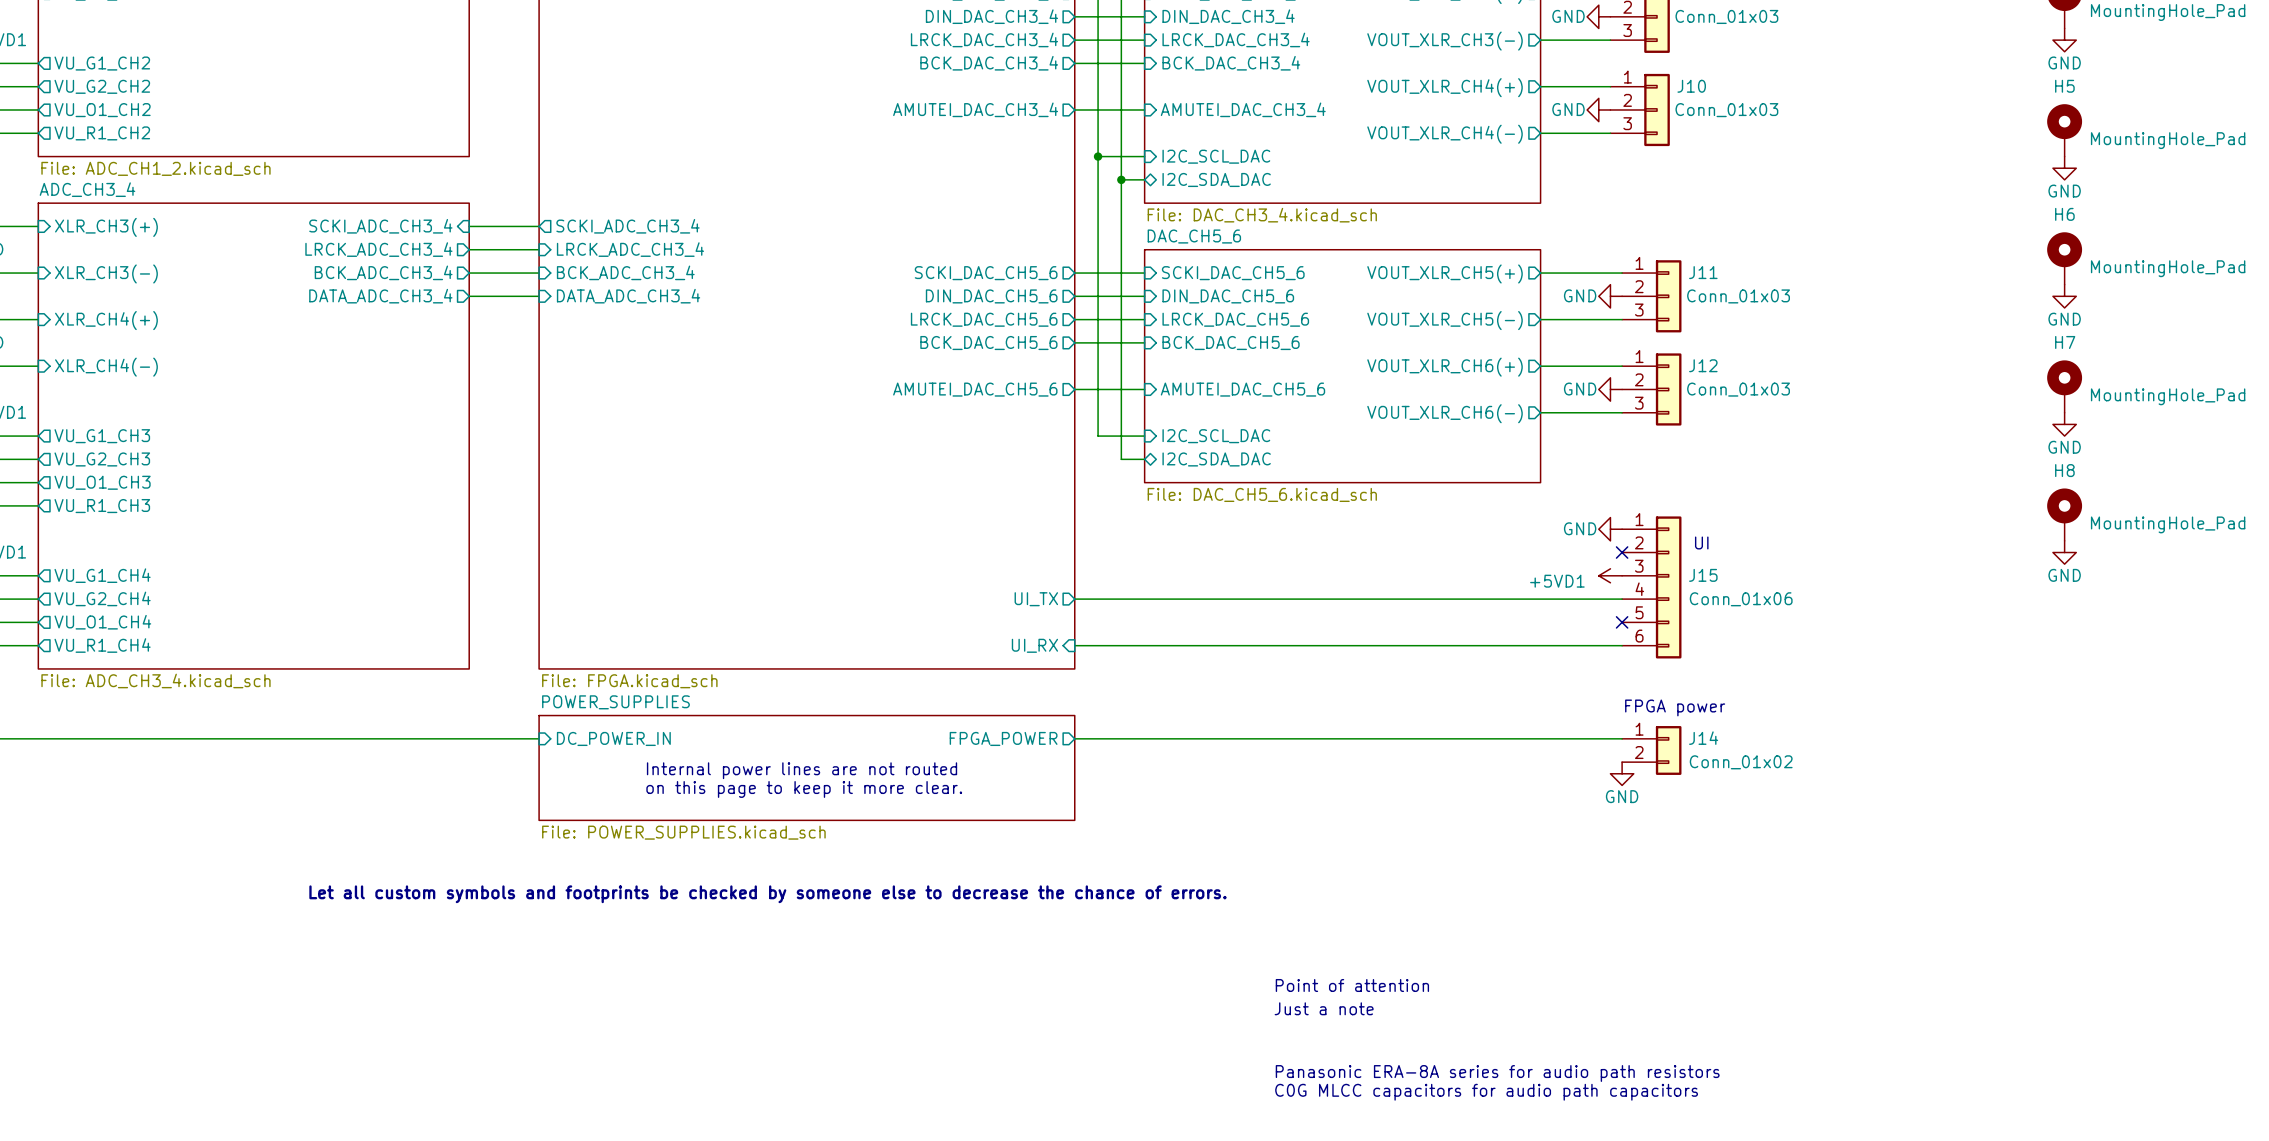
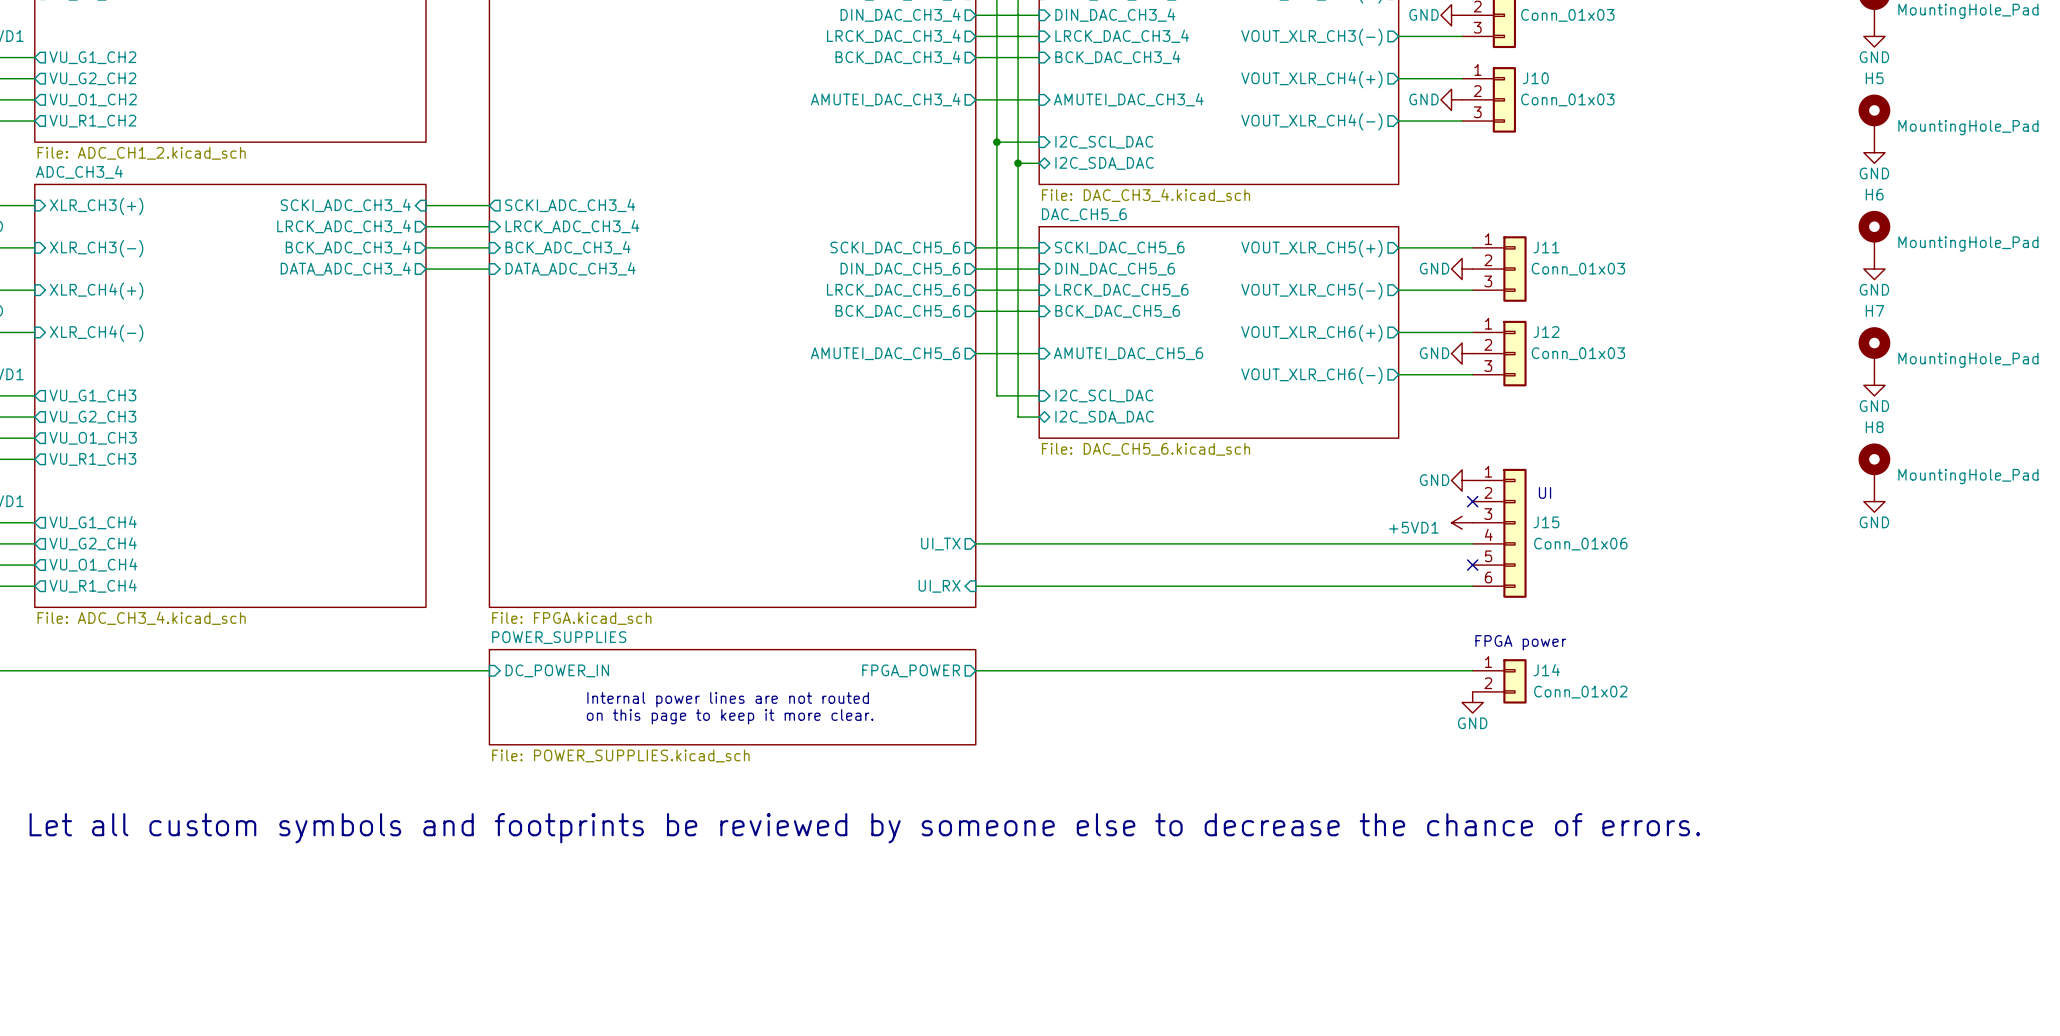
text: Let all custom symbols and footprints be checked by someone else to decrease the chance of errors. (767, 894) -> none
text: none -> Let all custom symbols and footprints be reviewed by someone else to decrease the chance of errors. (864, 828)
text: Point of attention (1352, 985) -> none
text: Just a note (1324, 1008) -> none
text: Panasonic ERA-8A series for audio path resistors (1497, 1073) -> none
text: C0G MLCC capacitors for audio path capacitors (1486, 1092) -> none

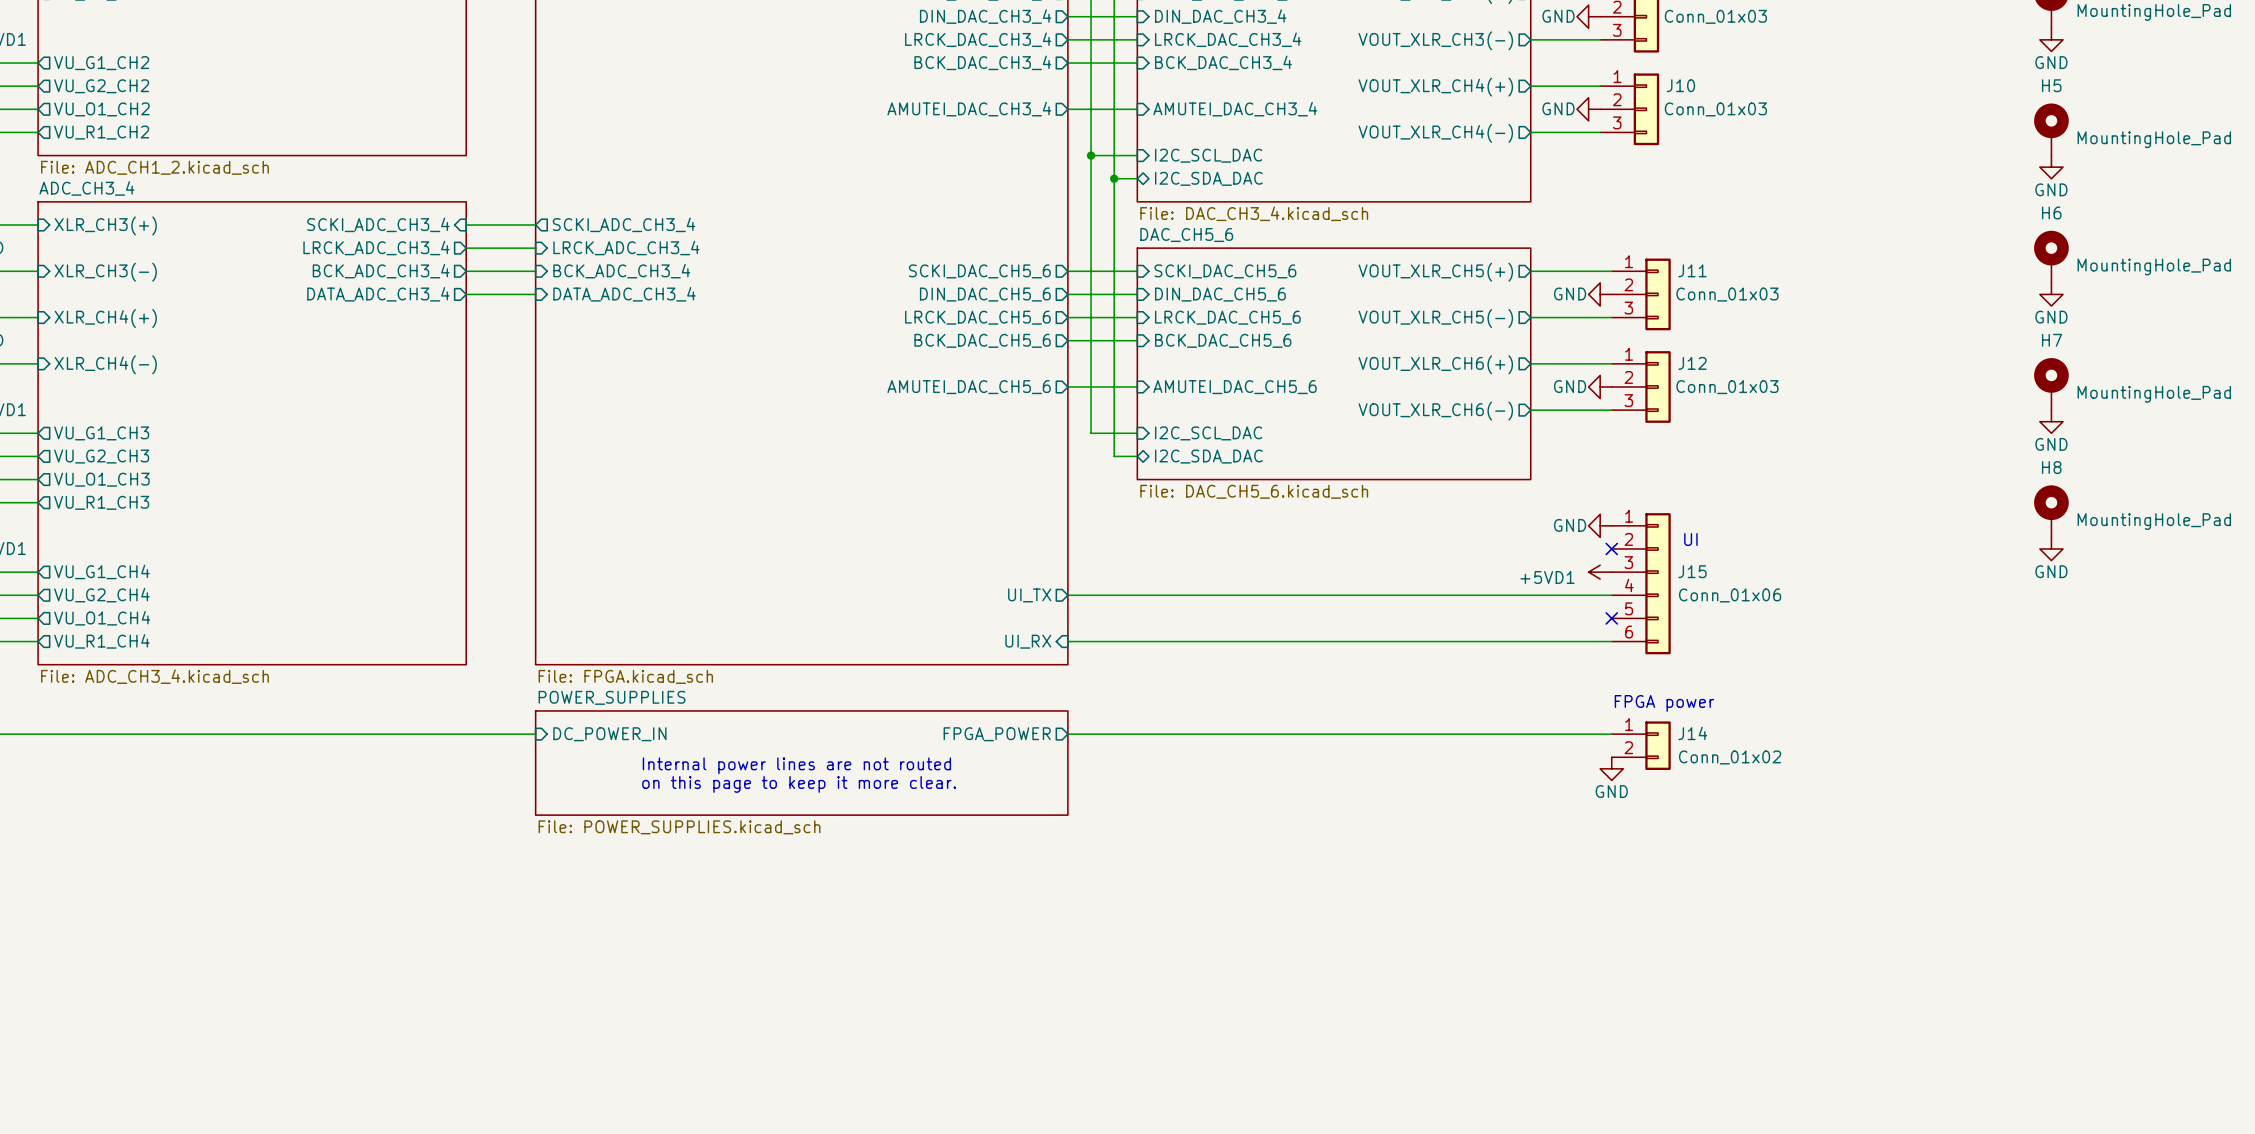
text: Let all custom symbols and footprints be reviewed by someone else to decrease the chance of errors. (864, 828) -> none

